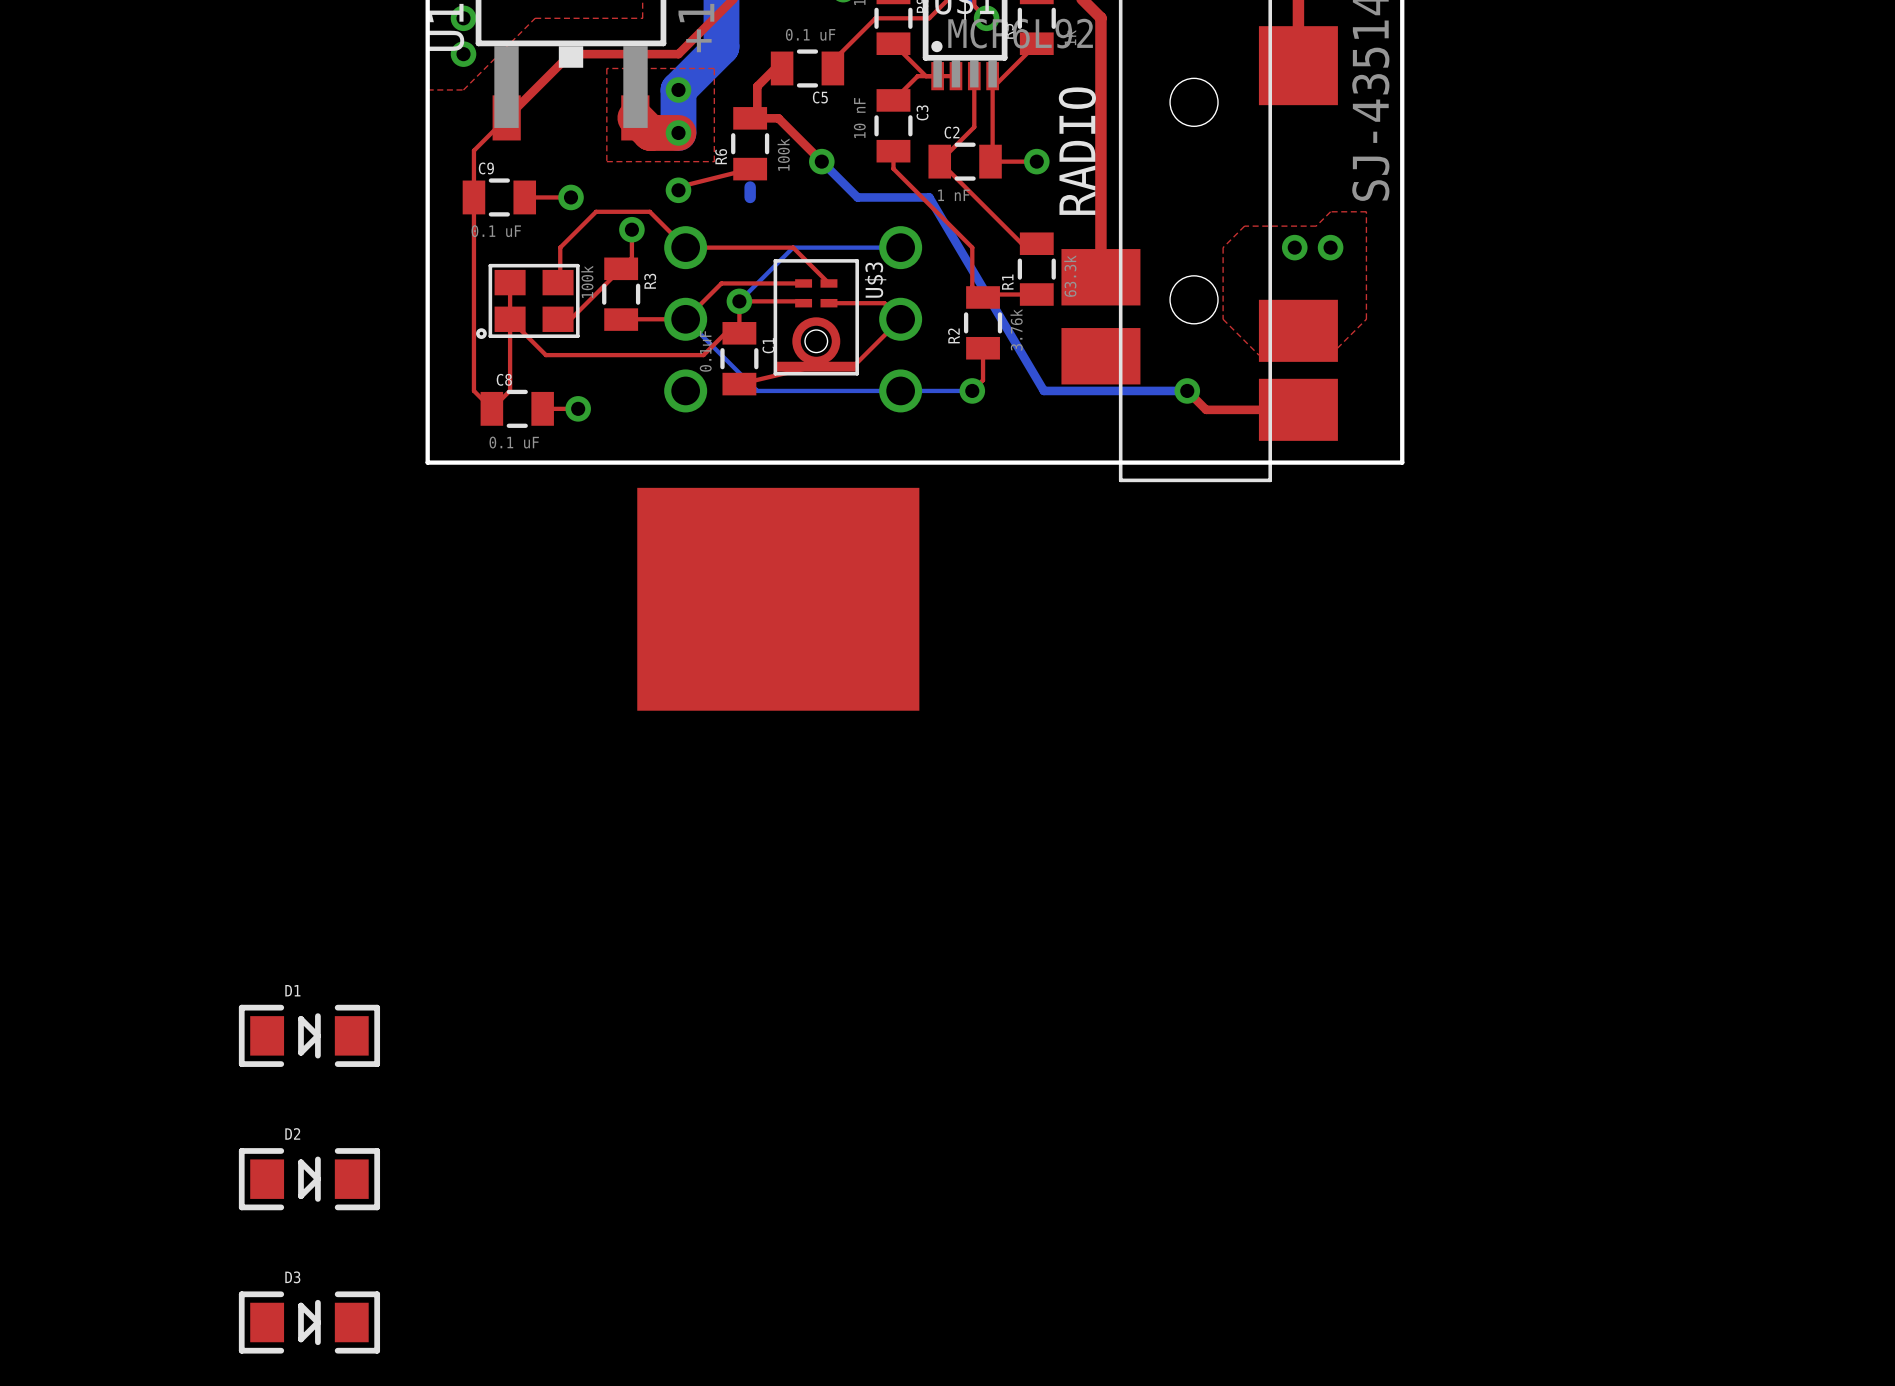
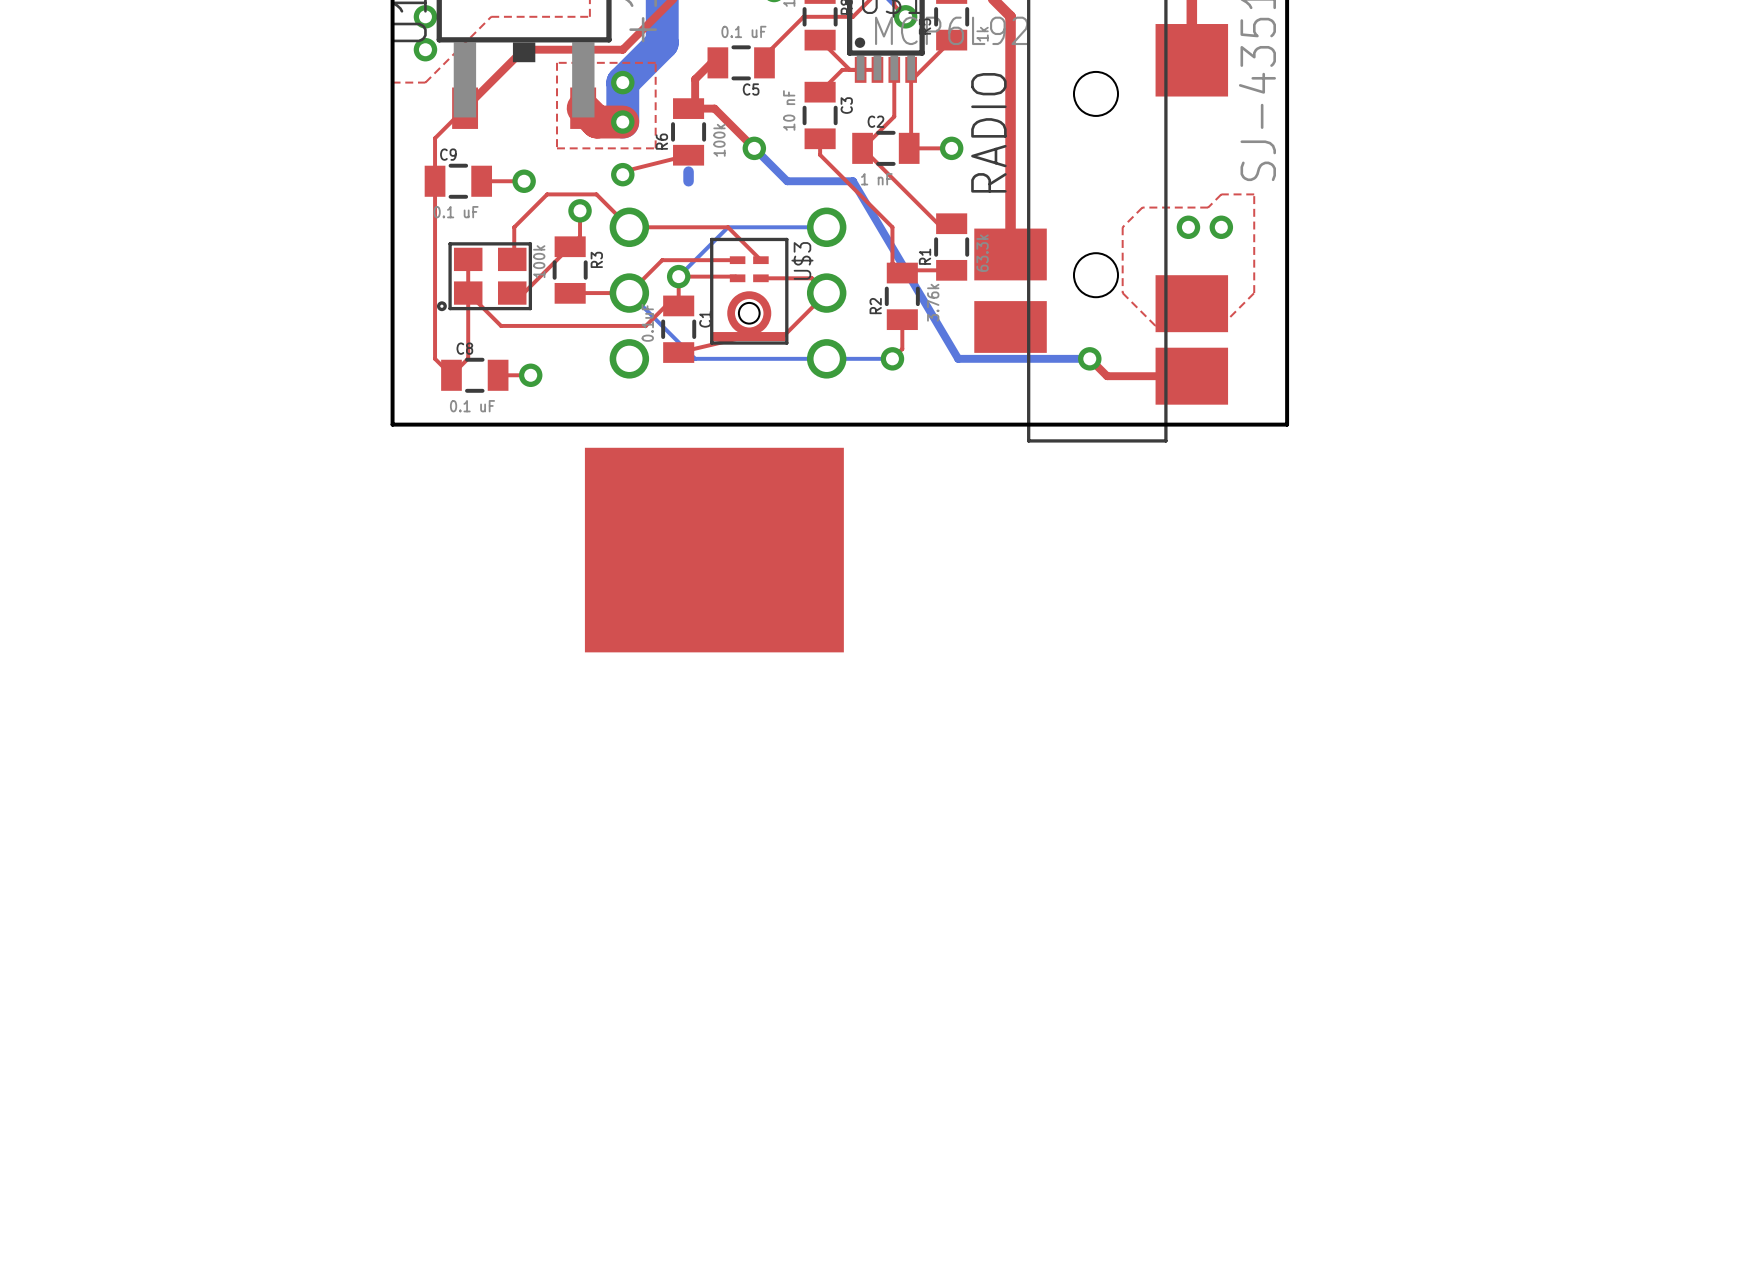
D1: (309, 1035) -> none
D2: (309, 1179) -> none
D3: (309, 1322) -> none

